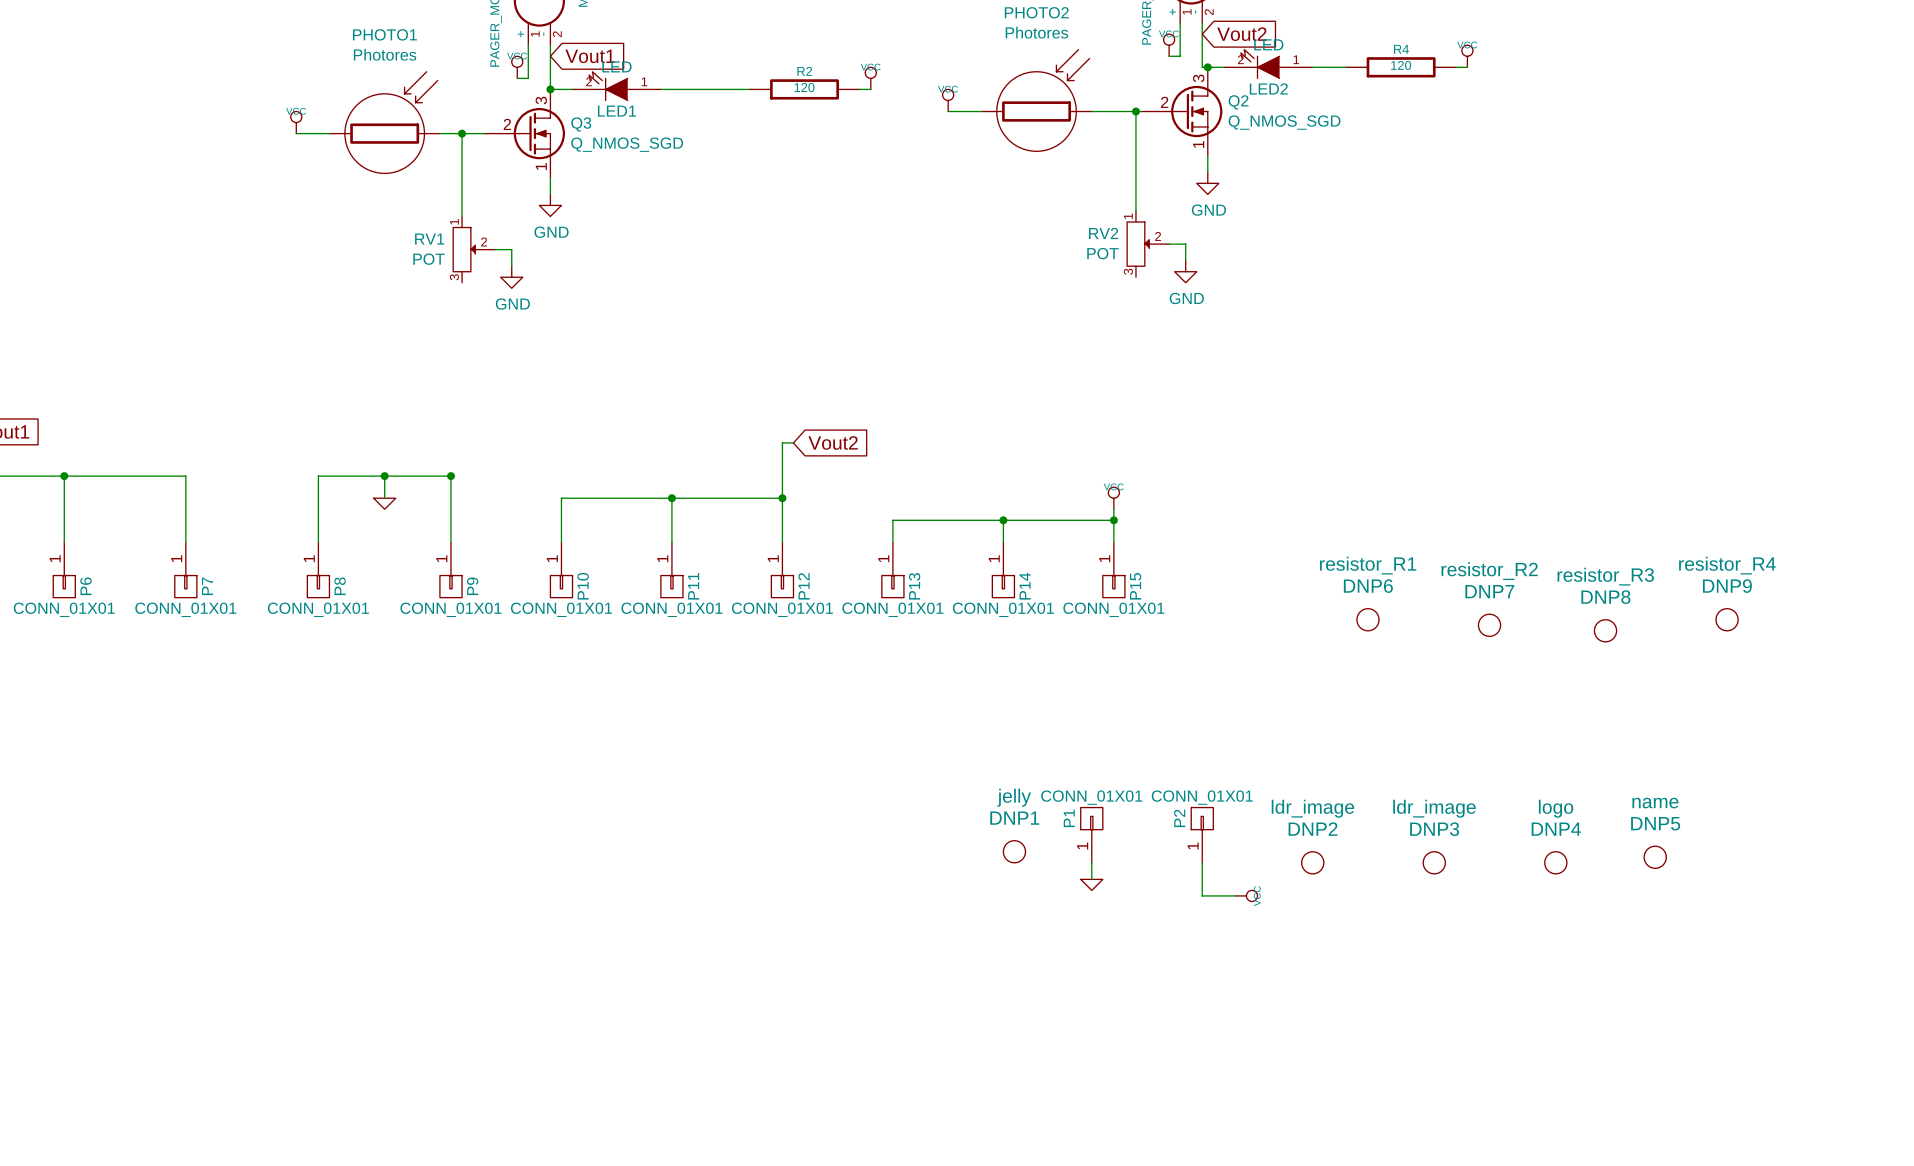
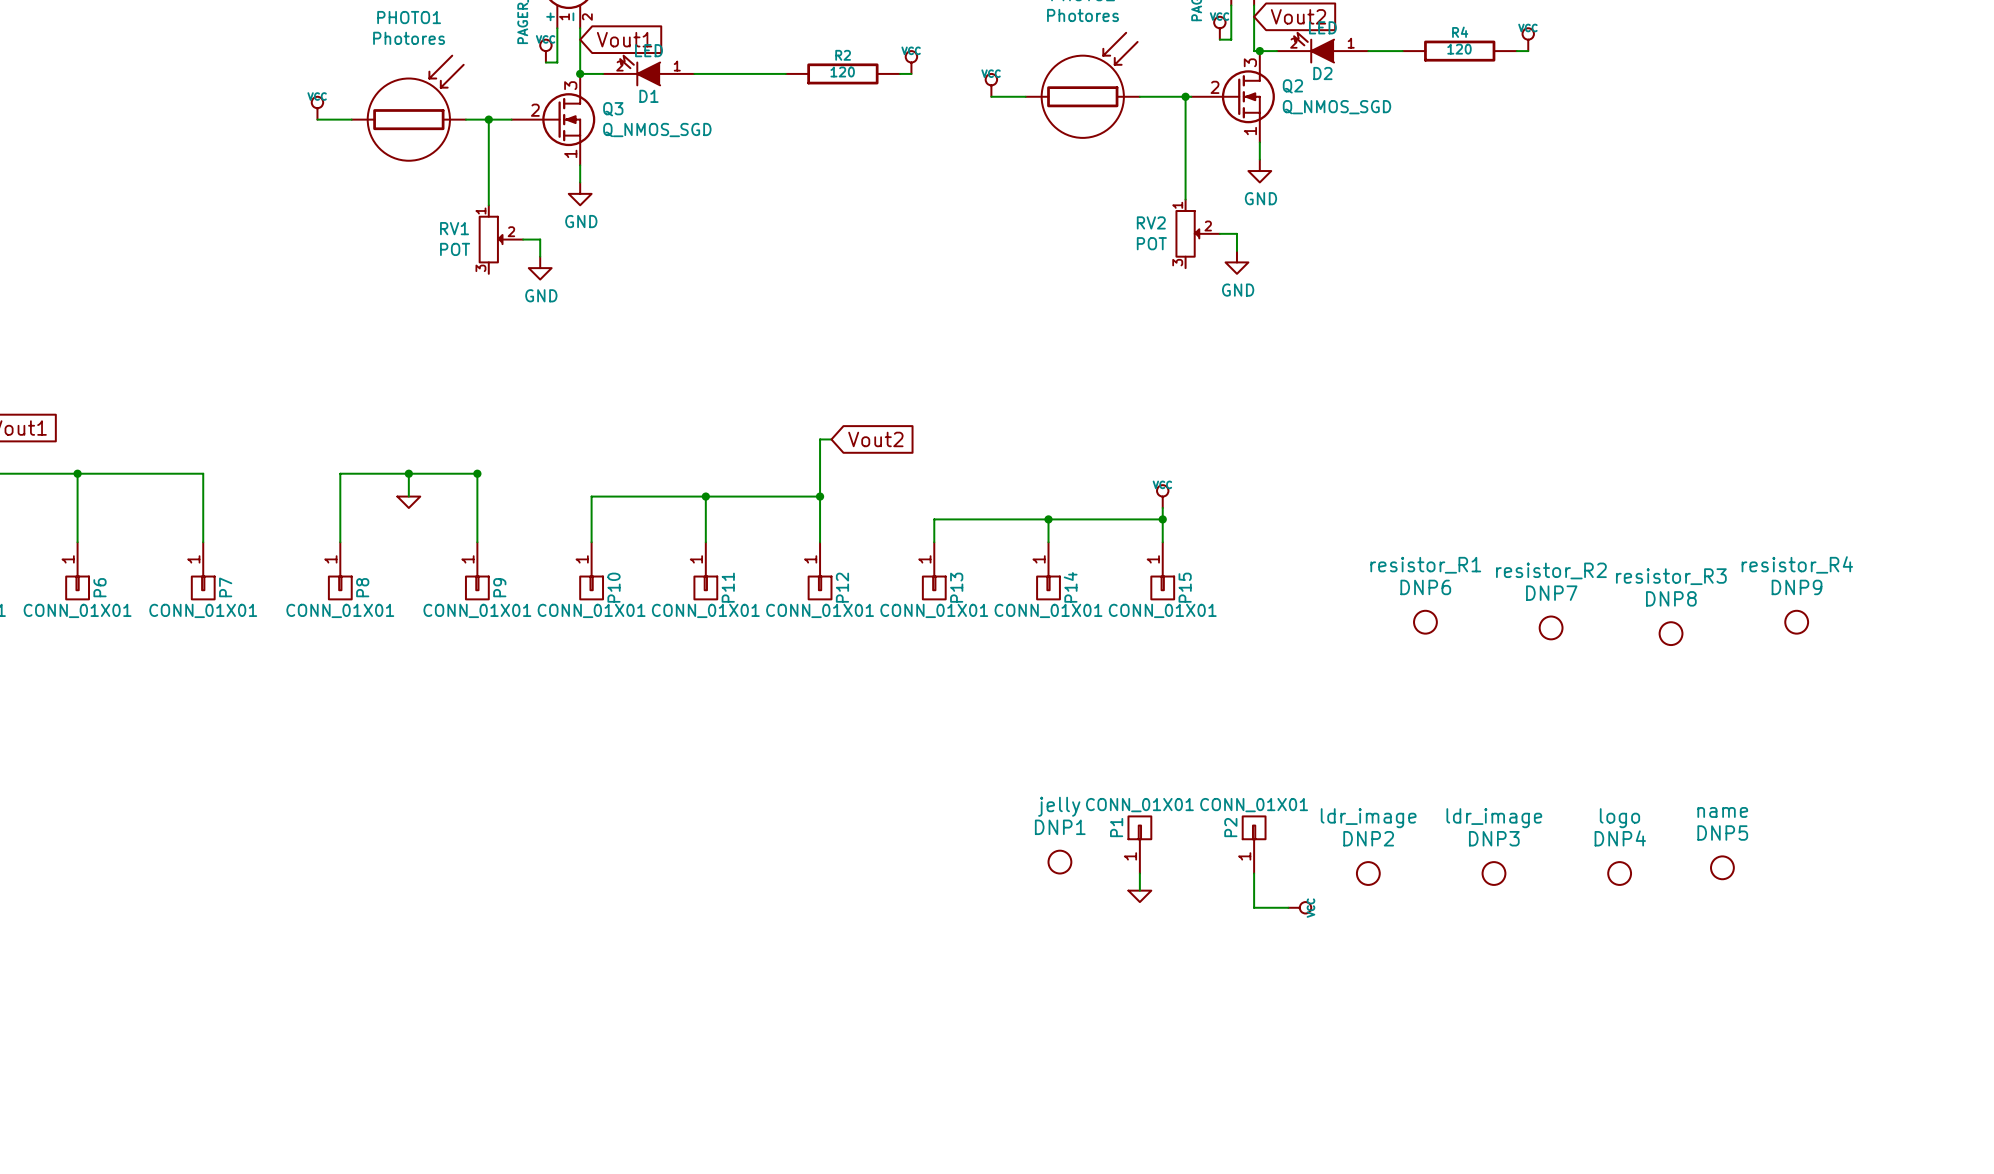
LED2 name: LED2 (1268, 88) -> D2 (1322, 73)
LED1 name: LED1 (616, 111) -> D1 (648, 96)

